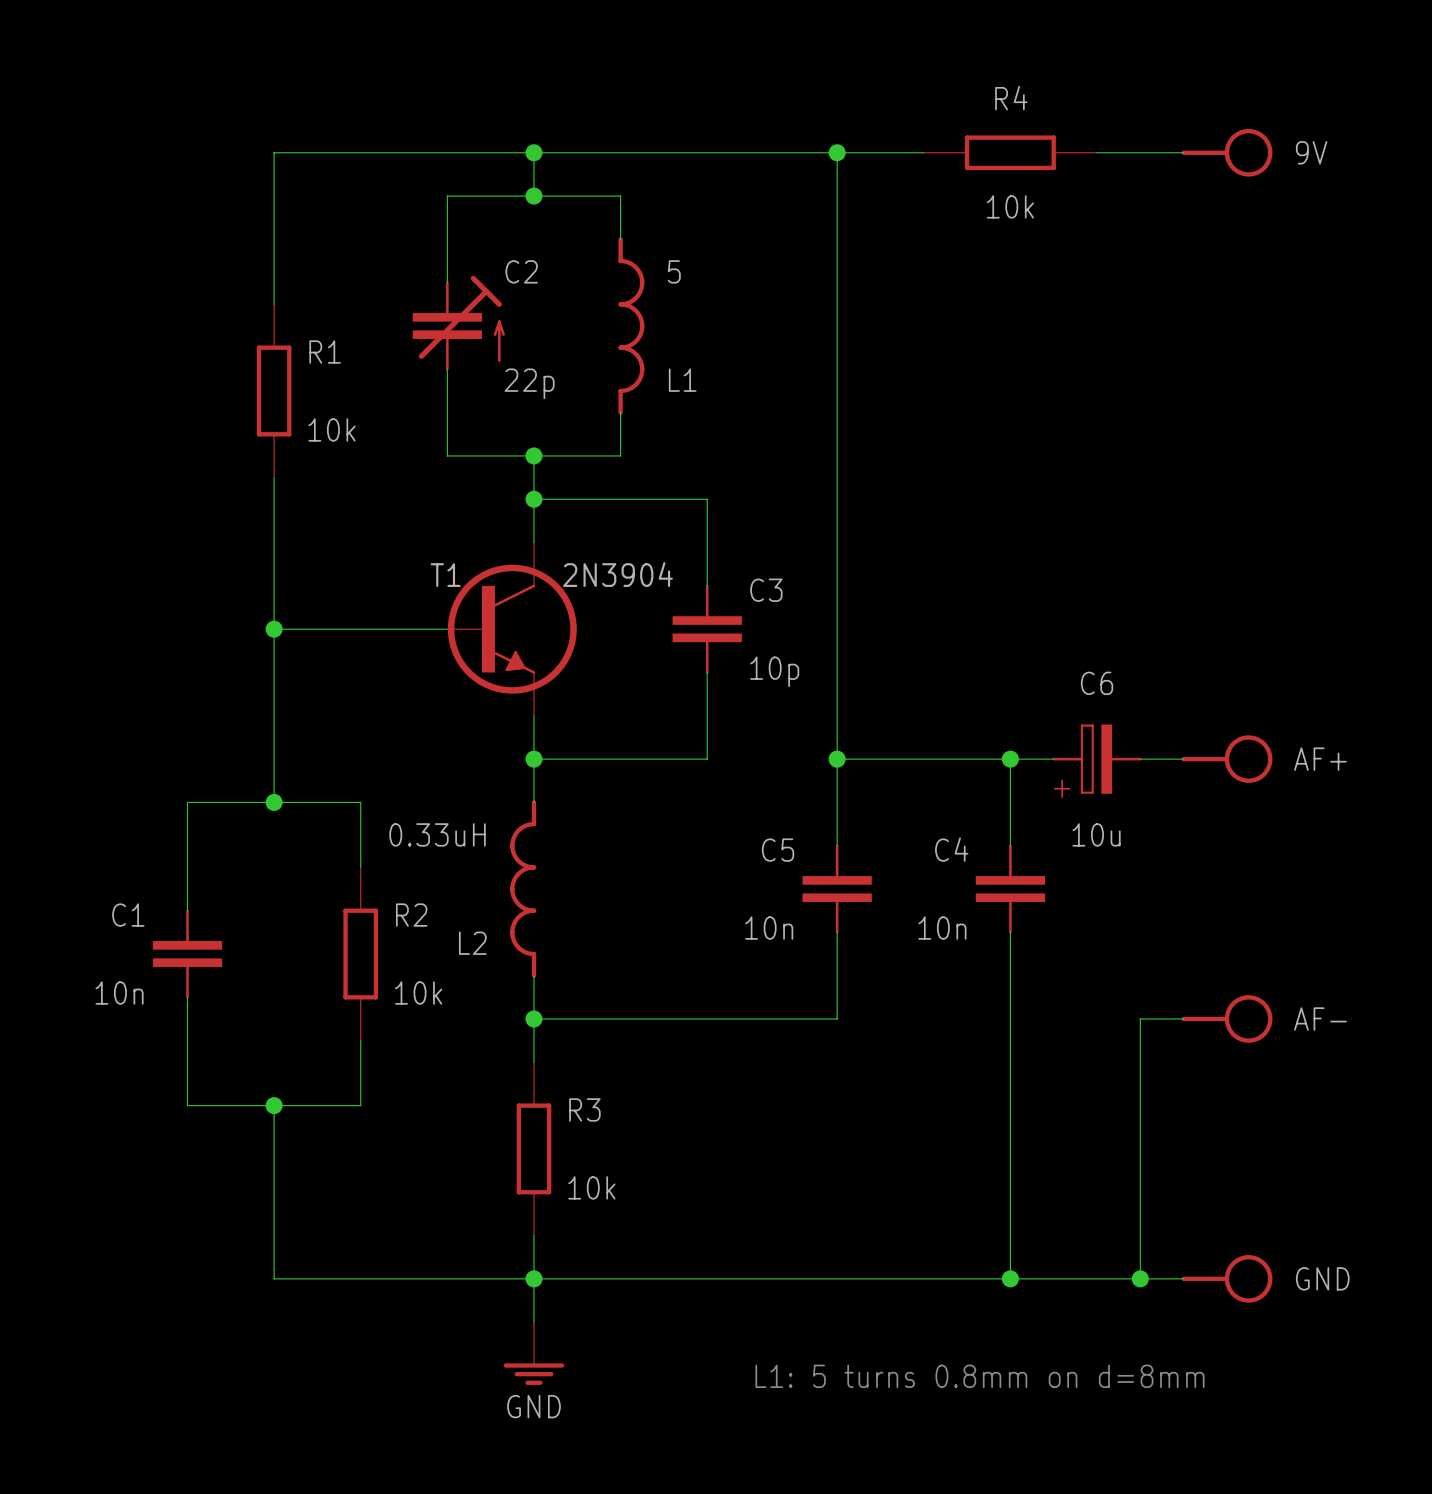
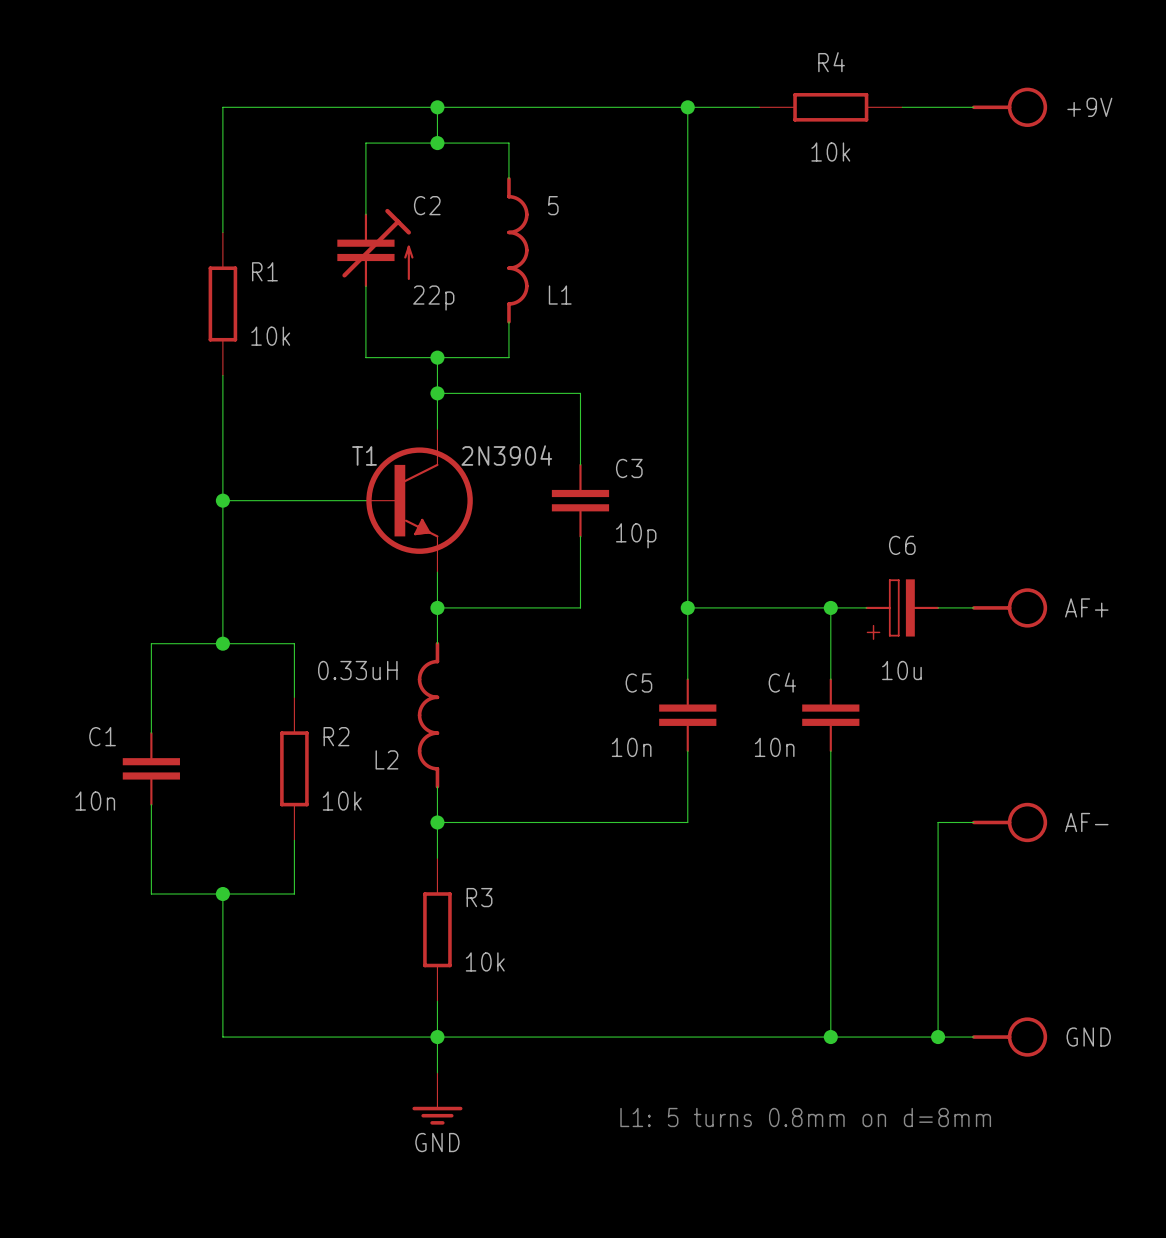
9V name: 9V (1311, 152) -> +9V (1089, 107)

